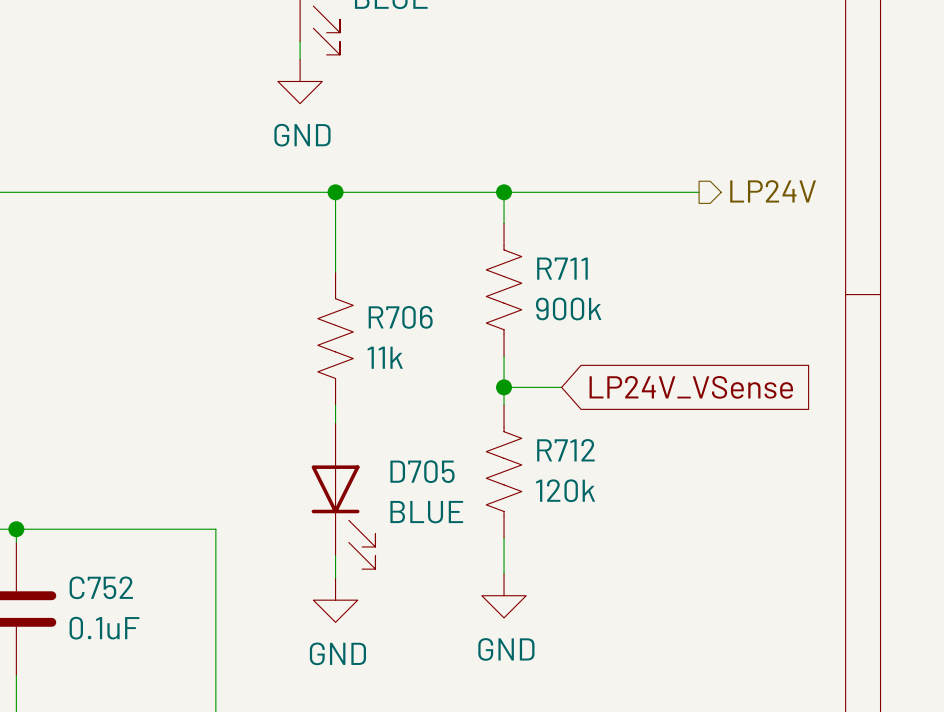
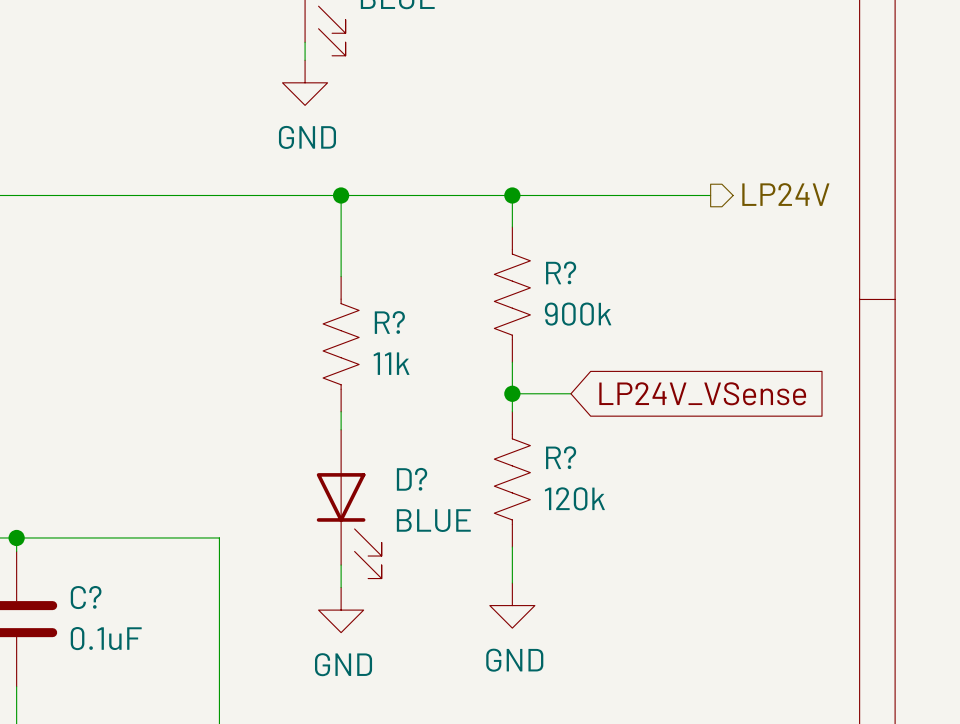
R711 name: R711 (562, 268) -> R? (561, 272)
R706 name: R706 (400, 317) -> R? (389, 322)
R712 name: R712 (565, 450) -> R? (561, 457)
D705 name: D705 (422, 471) -> D? (412, 479)
C752 name: C752 (101, 587) -> C? (86, 597)

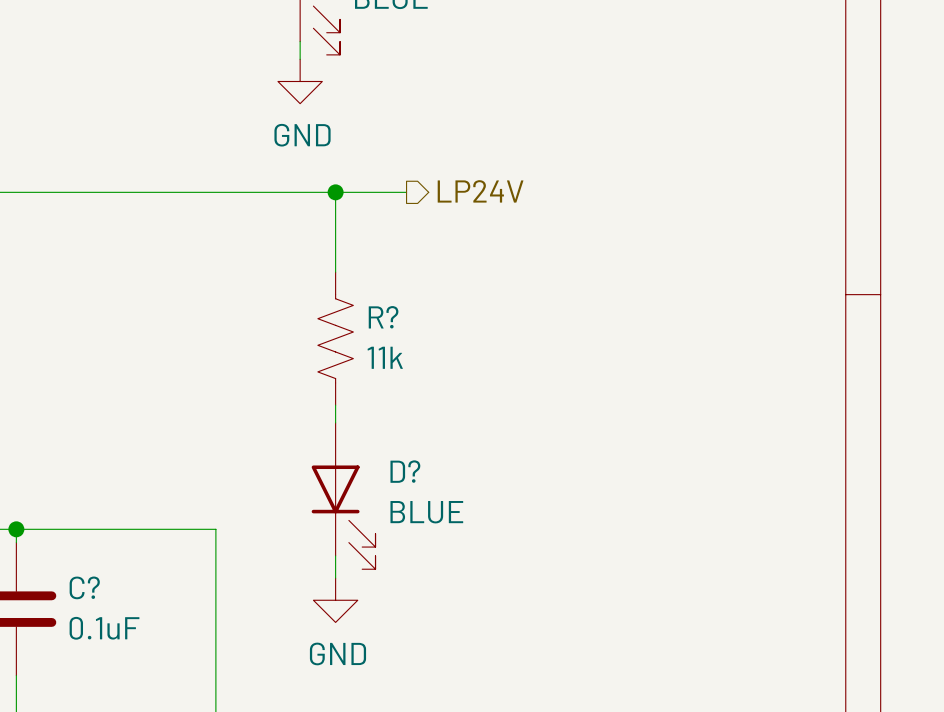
hierarchical label position: LP24V (785, 194) -> LP24V (480, 191)
wire: (413, 195) (710, 195) -> none
wire: (512, 195) (512, 227) -> none
junction: (512, 195) -> none
R?: 900k (512, 294) -> none
wire: (512, 362) (512, 411) -> none
wire: (512, 393) (570, 393) -> none
junction: (512, 393) -> none
global label: LP24V_VSense (702, 393) -> none
R?: 120k (512, 479) -> none
wire: (512, 547) (512, 583) -> none
power symbol: GND (512, 605) -> none

